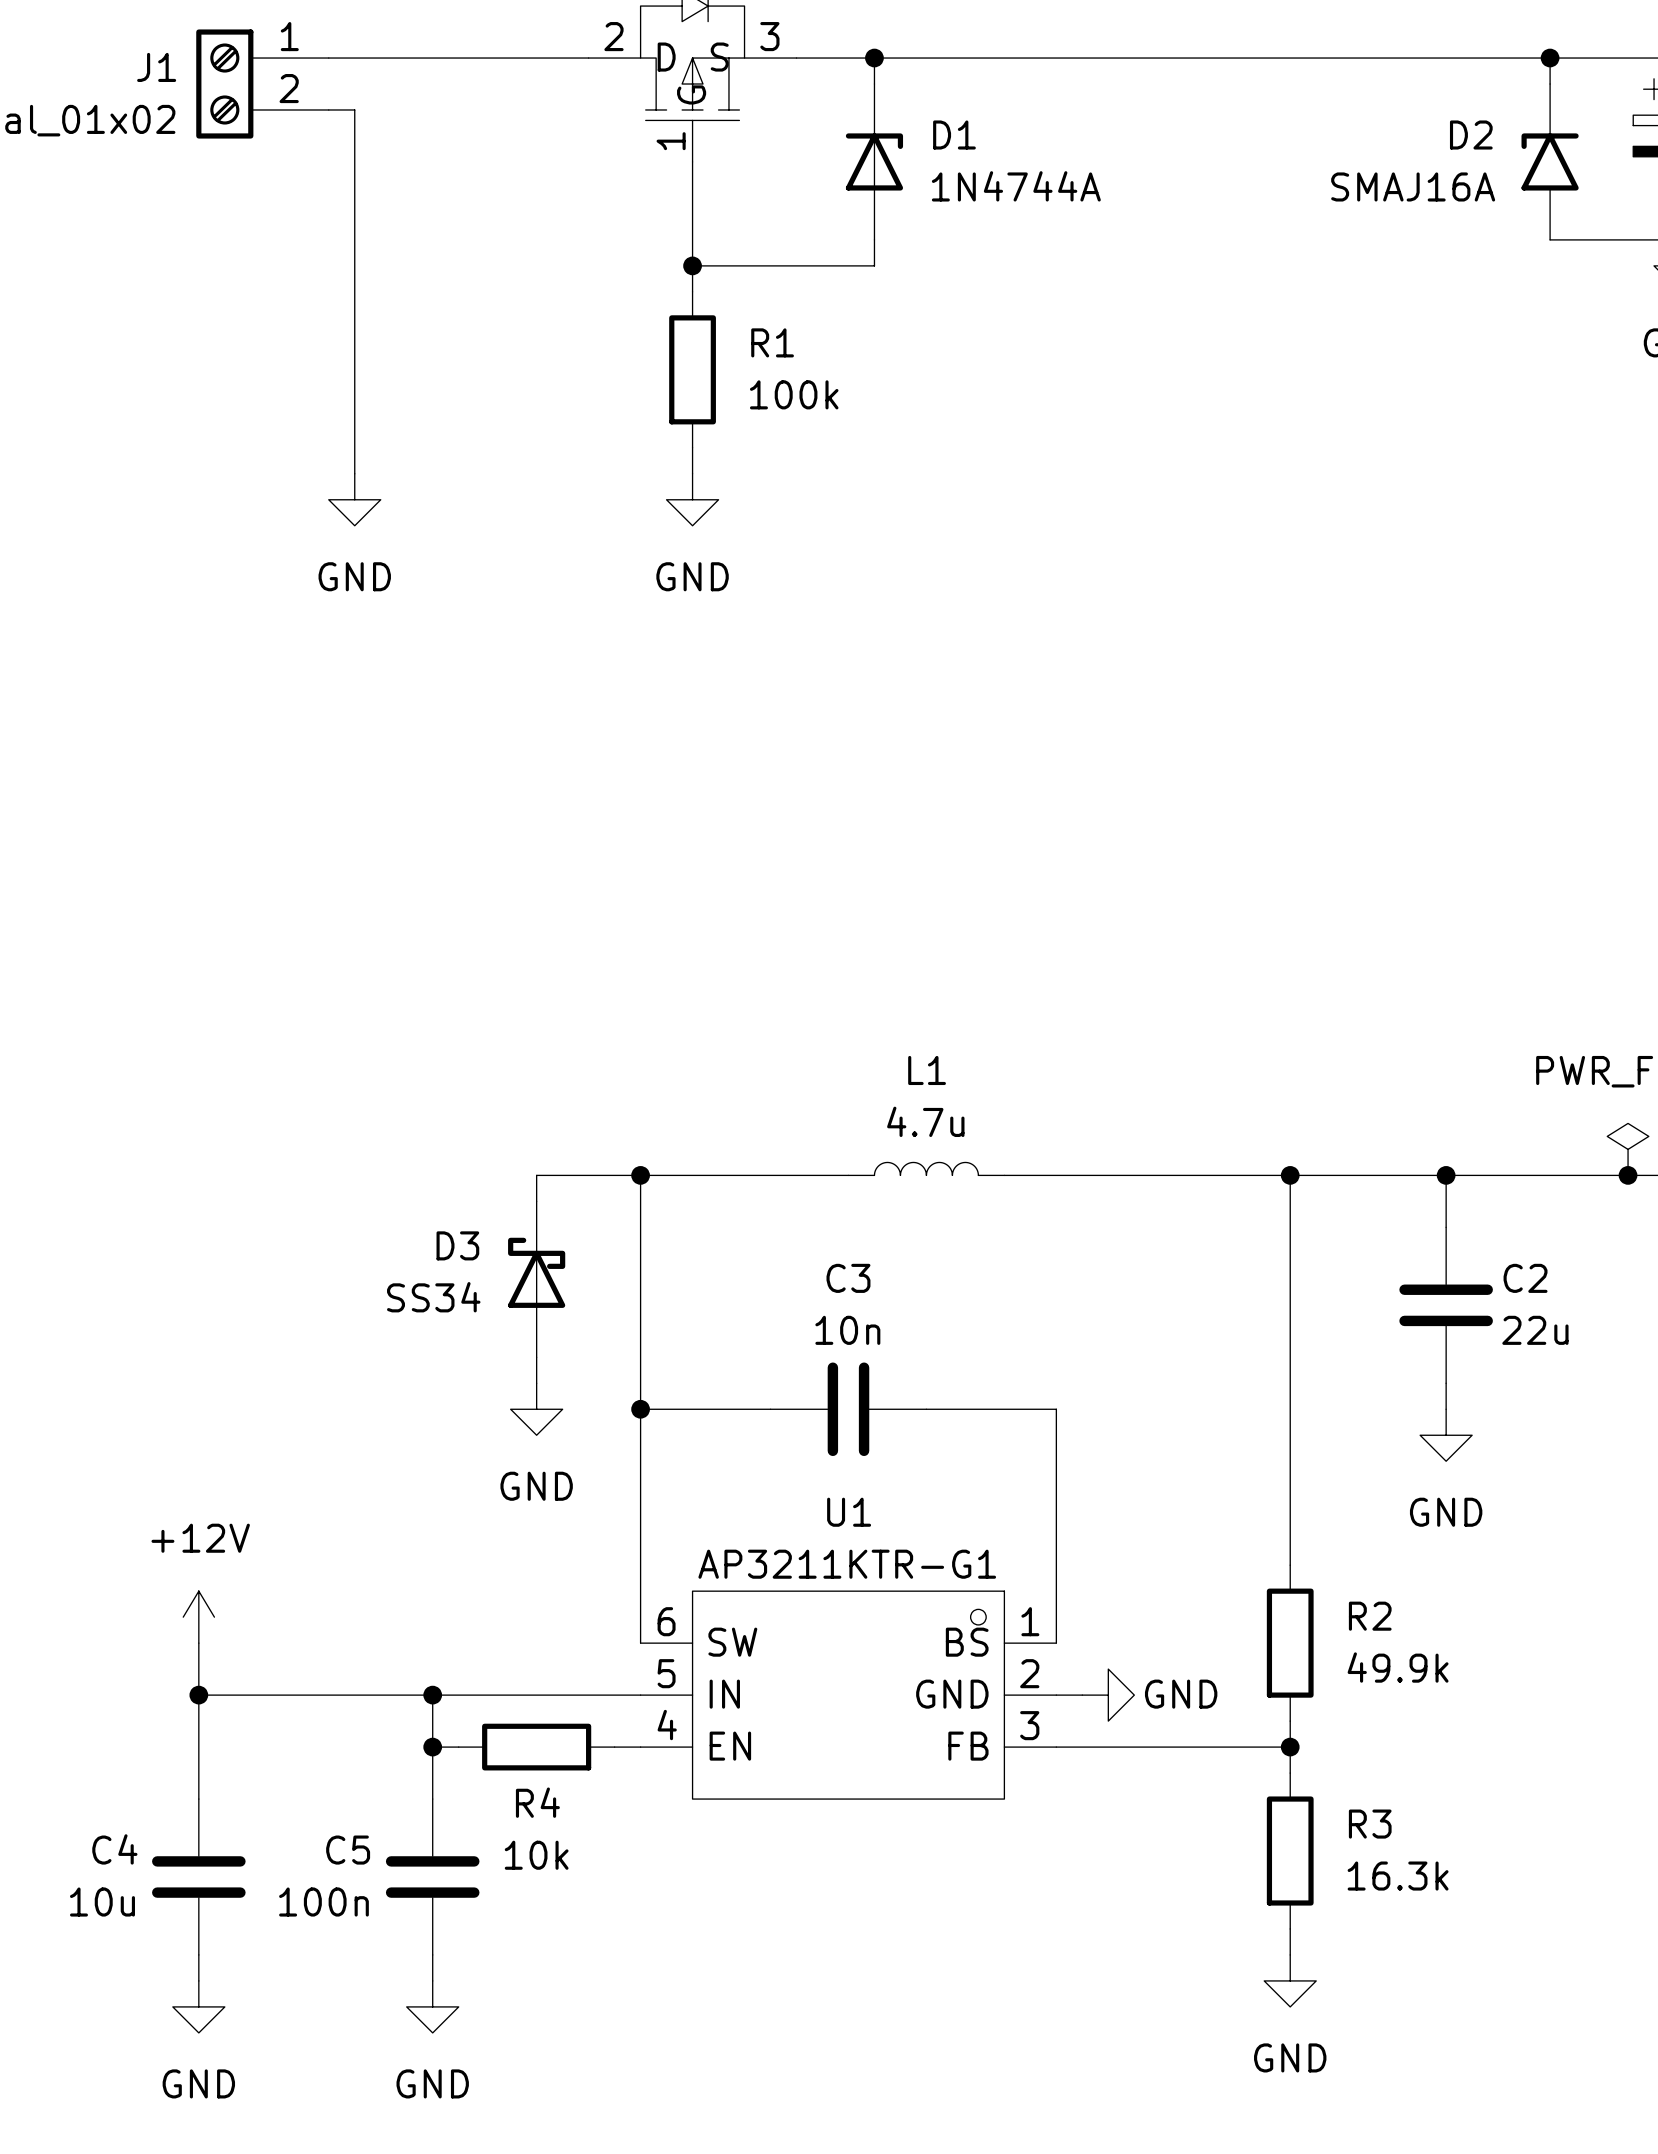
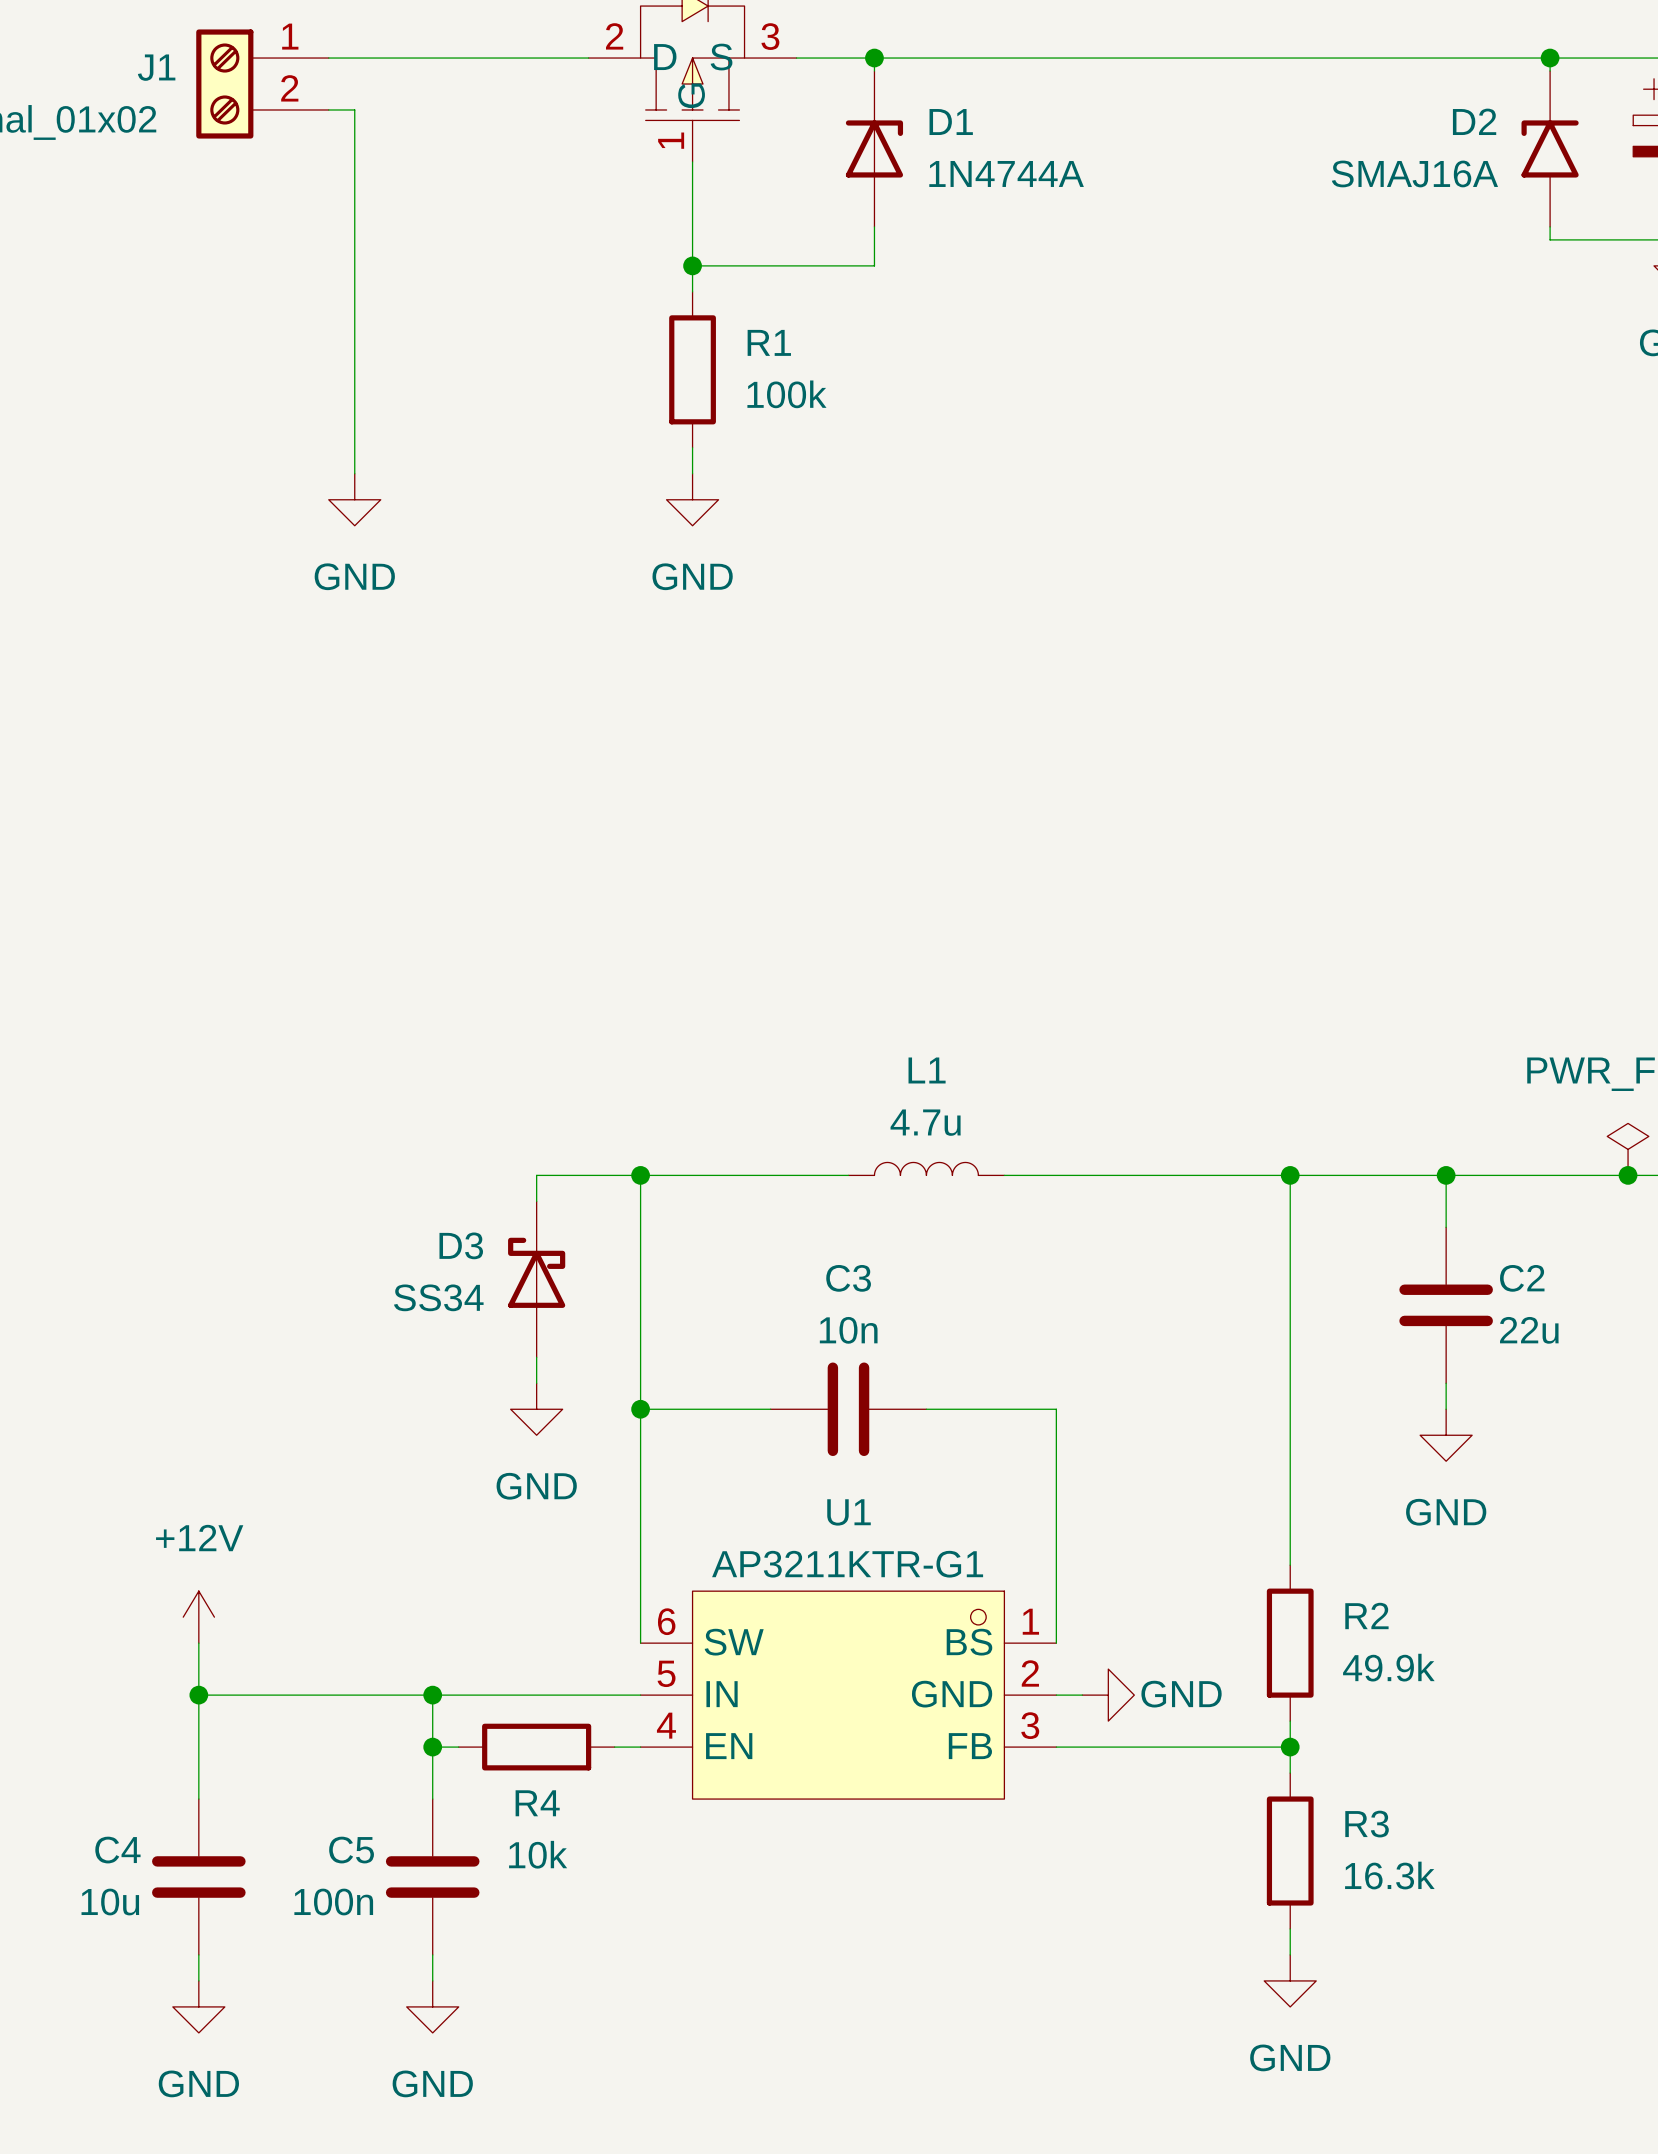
D1 position: (874, 161) -> (874, 148)
D2 position: (1550, 161) -> (1550, 148)

